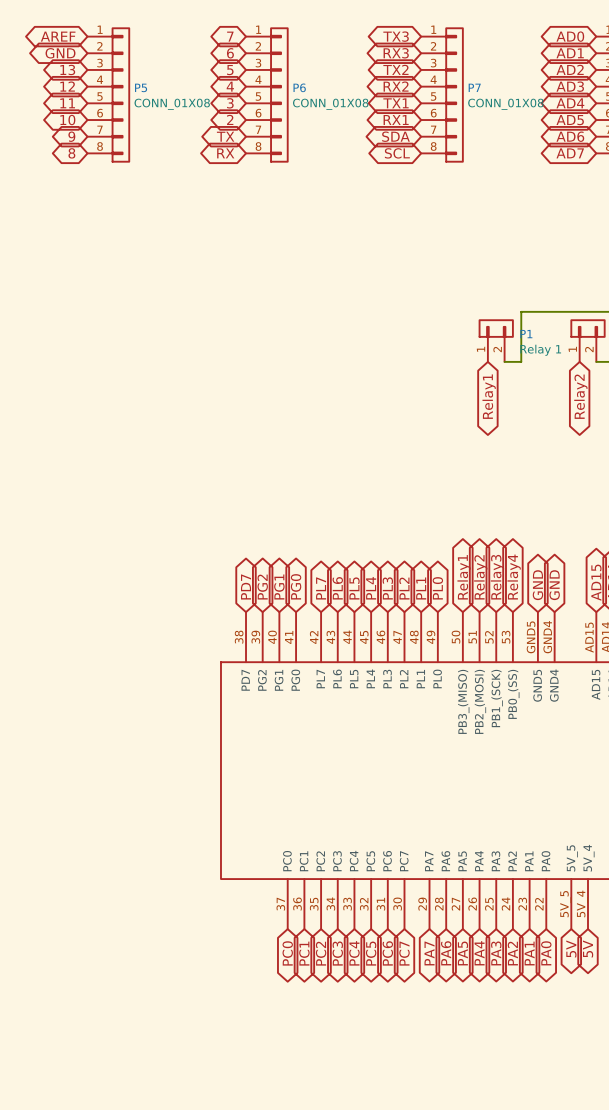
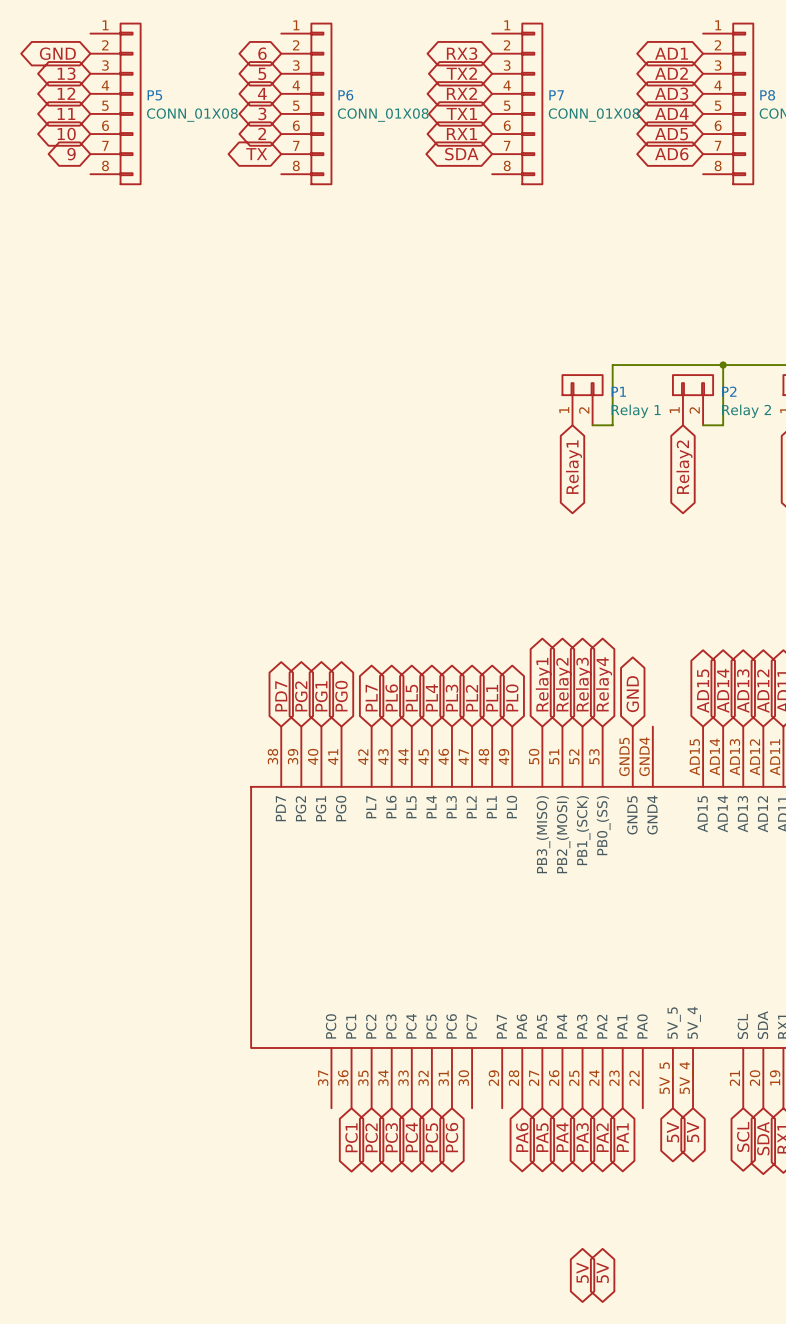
global label: AREF (58, 36) -> none
global label: 7 (230, 36) -> none
global label: TX3 (396, 36) -> none
global label: AD0 (570, 36) -> none
global label: 8 (71, 153) -> none
global label: RX (225, 153) -> none
global label: SCL (397, 153) -> none
global label: AD7 (570, 153) -> none
global label: GND (554, 585) -> none
global label: PC0 (287, 953) -> none
global label: PC7 (404, 953) -> none
global label: PA7 (429, 953) -> none
global label: PA0 (546, 953) -> none
global label: none -> 5V (582, 1272)
global label: none -> 5V (602, 1272)

